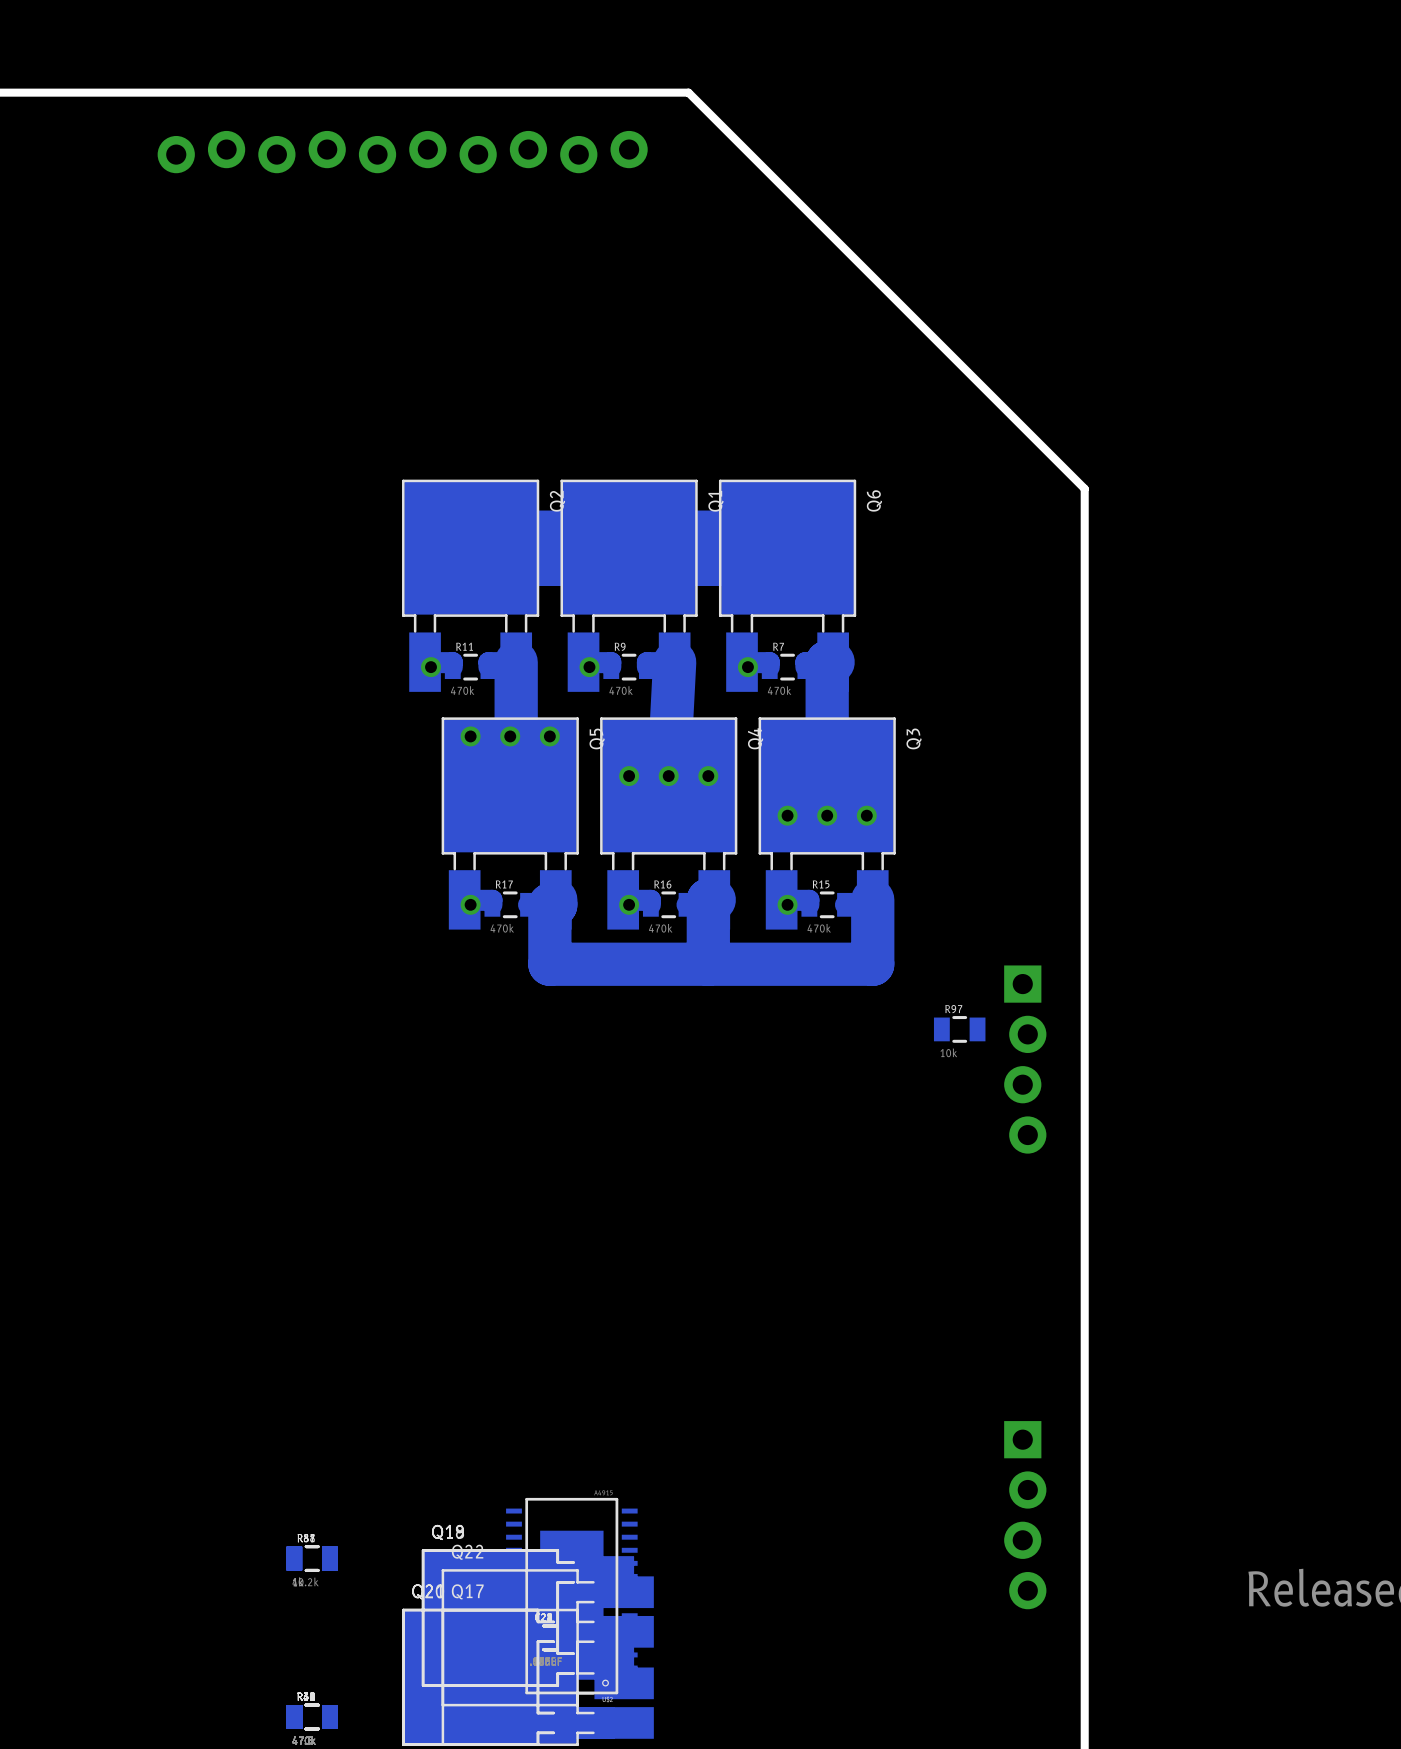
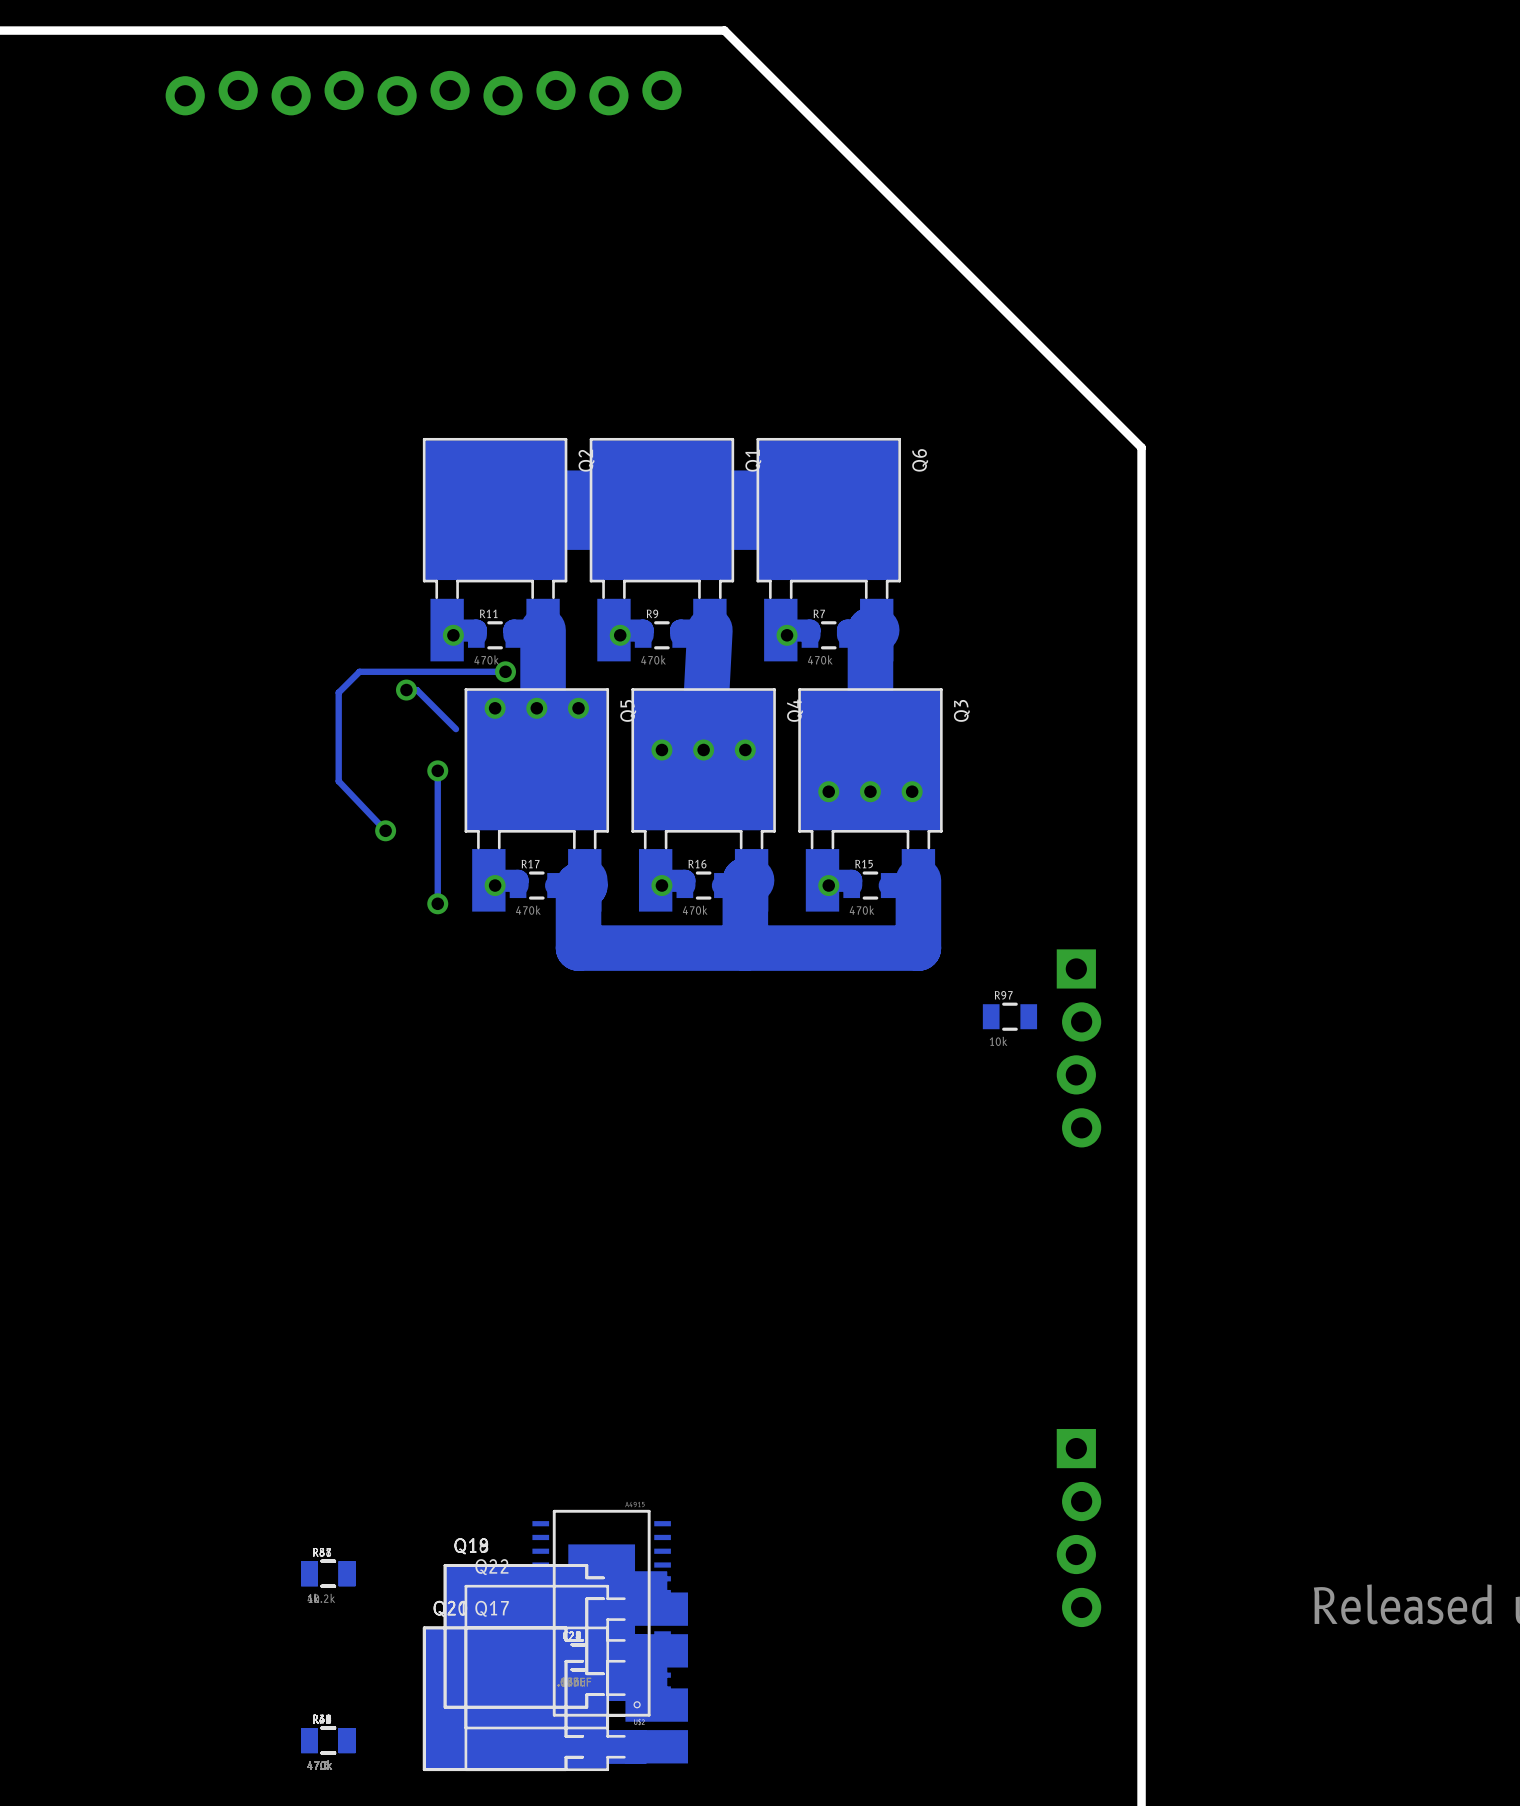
track: none -> (505, 671) (359, 671) (338, 692) (338, 781) (385, 830)
via: none -> (505, 671)
track: none -> (406, 690) (416, 690) (456, 729)
via: none -> (406, 690)
track: none -> (437, 770) (437, 903)
via: none -> (437, 770)
via: none -> (385, 830)
via: none -> (437, 903)

